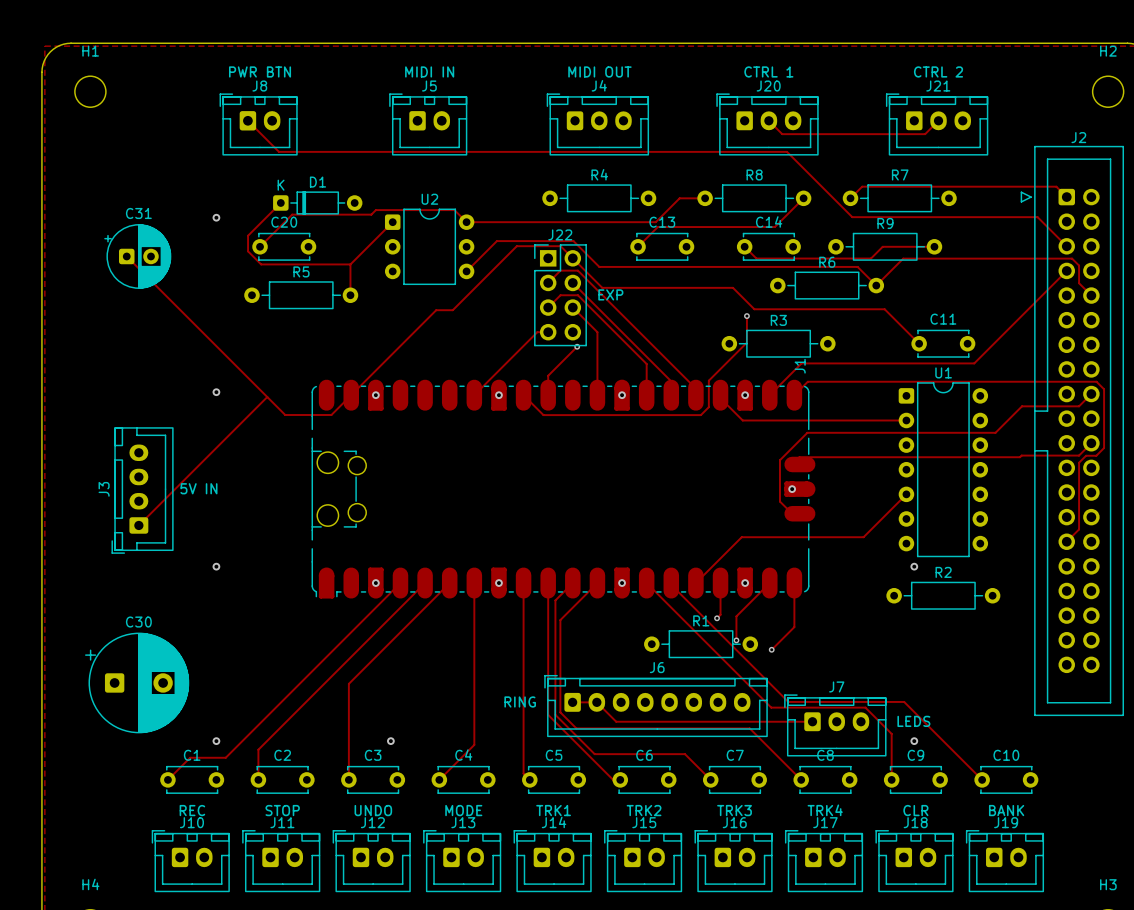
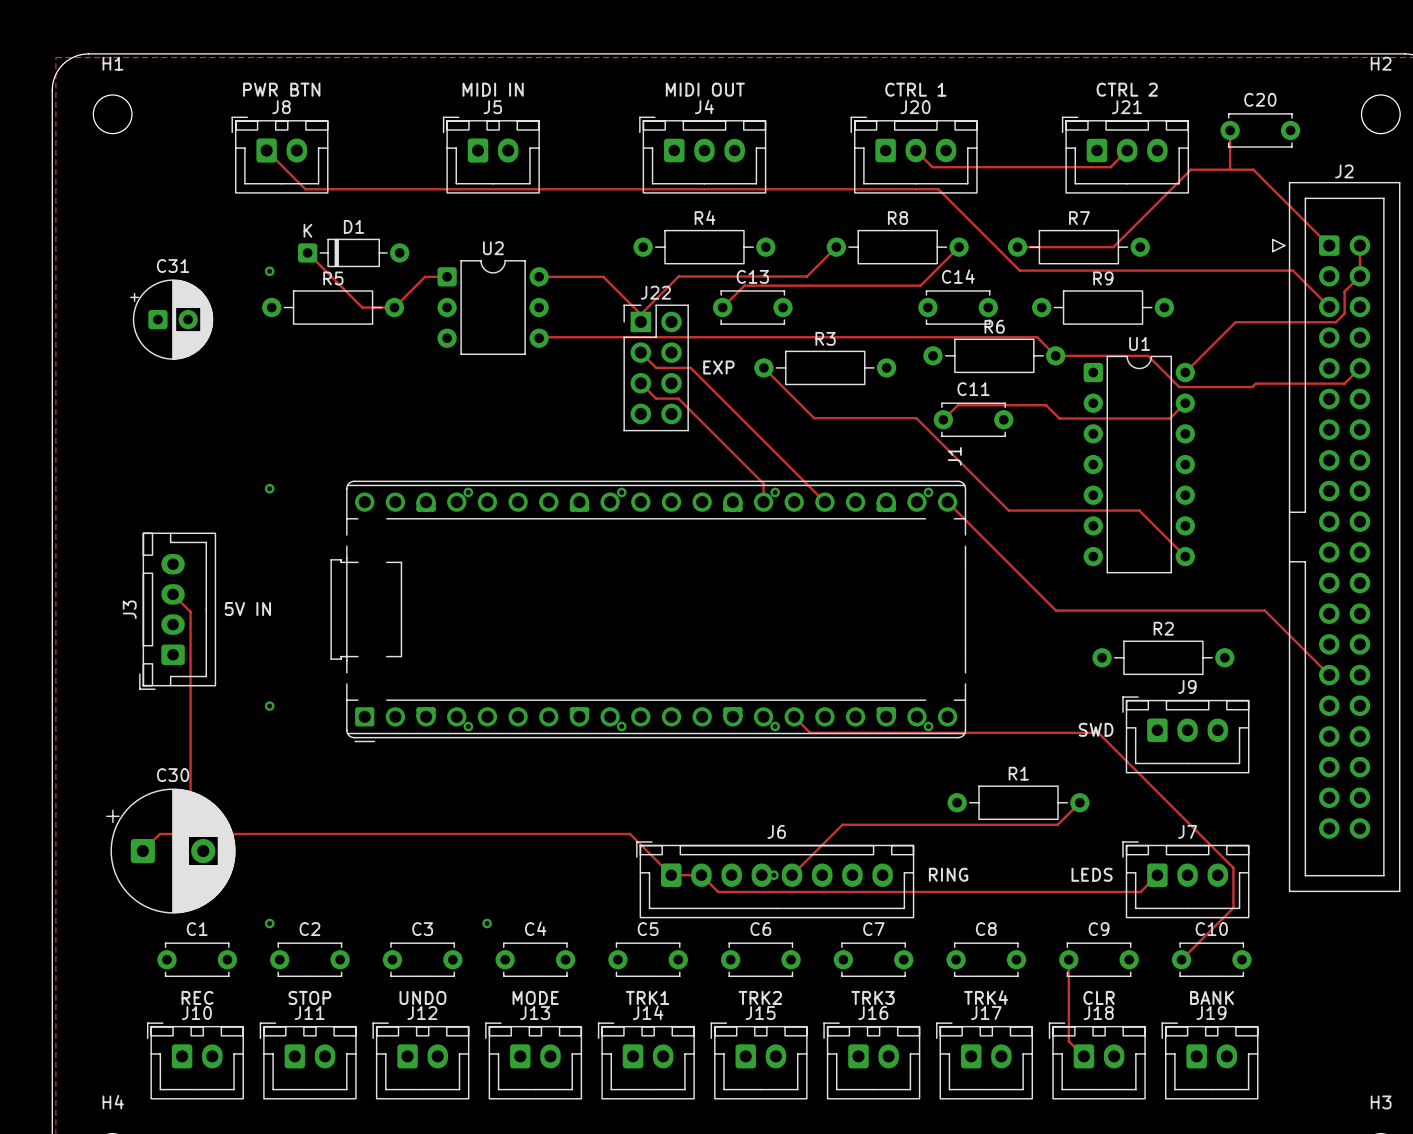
text position: PWR BTN (260, 71) -> PWR BTN (281, 89)
text position: MIDI IN (429, 71) -> MIDI IN (493, 89)
text position: MIDI OUT (599, 71) -> MIDI OUT (705, 89)
text position: CTRL 1 (768, 71) -> CTRL 1 (915, 89)
text position: CTRL 2 (938, 71) -> CTRL 2 (1127, 89)
track: none -> (1230, 130) (1230, 169)
track: (247, 120) (279, 151) -> (266, 150) (305, 189) (347, 189)
track: (768, 120) (782, 134) -> (915, 150) (932, 167) (974, 167)
track: (938, 120) (925, 134) (891, 134) -> (1127, 150) (1110, 167)
J8 position: (258, 124) -> (279, 155)
J5 position: (428, 124) -> (491, 155)
J4 position: (597, 124) -> (702, 155)
J20 position: (767, 124) -> (914, 155)
J21 position: (937, 124) -> (1125, 155)
track: (753, 151) (787, 151) (852, 217) -> (938, 189) (1019, 270) (1062, 270)
track: (1056, 186) (862, 186) (850, 198) -> (1316, 232) (1253, 169) (1190, 169) (1113, 247) (1017, 247)
R4 position: (599, 198) -> (704, 247)
track: none -> (836, 247) (807, 276) (678, 276) (640, 314)
track: (705, 198) (679, 198) (655, 222) (484, 222) -> (640, 314) (603, 276)
R8 position: (754, 198) -> (897, 247)
track: none -> (959, 247) (920, 285) (744, 285) (722, 307)
track: (803, 198) (774, 227) (657, 227) (638, 246) -> none
R7 position: (899, 198) -> (1078, 247)
track: none -> (307, 252) (362, 307) (394, 307) (425, 276) (447, 276)
track: (280, 202) (248, 235) (248, 251) (261, 264) (350, 264) -> none
D1 position: (317, 202) -> (353, 252)
track: (392, 222) (350, 264) -> none
track: (466, 222) (454, 210) (375, 210) (371, 214) (292, 214) (260, 246) -> (581, 276) (539, 276)
C20 position: (284, 246) -> (1260, 130)
U2 position: (429, 246) -> (493, 307)
C13 position: (662, 246) -> (752, 307)
track: (744, 246) (756, 258) (871, 258) (882, 246) (934, 246) -> none
track: (126, 256) (285, 414) (331, 414) (436, 310) (452, 310) (516, 246) (560, 246) (602, 287) (732, 287) (754, 309) (884, 309) (919, 343) -> none
track: (991, 258) (903, 258) (876, 285) (857, 266) (599, 266) (573, 241) (496, 241) (466, 271) -> (1235, 322) (1185, 372)
track: (1072, 258) (1079, 265) (1079, 283) (1091, 295) -> (1335, 322) (1344, 313) (1344, 291) (1359, 276) (1359, 245)
track: (350, 264) (350, 295) -> none
track: (560, 270) (548, 282) -> (698, 337) (539, 338)
track: (577, 270) (695, 388) (695, 395) -> (720, 337) (1037, 337) (1055, 355) (1148, 355) (1179, 387) (1252, 387) (1255, 383) (1344, 383) (1359, 368)
track: (1066, 270) (974, 363) (801, 363) (769, 395) -> none
track: none -> (640, 352) (656, 367) (690, 367) (824, 502)
track: (572, 282) (671, 381) (671, 395) -> none
R6 position: (827, 285) -> (994, 355)
text position: EXP (610, 294) -> EXP (718, 367)
R5 position: (301, 295) -> (333, 307)
J22 position: (560, 295) -> (656, 367)
track: none -> (763, 367) (814, 418) (916, 418) (1008, 510) (1139, 510) (1185, 556)
track: none -> (640, 383) (656, 398) (678, 398) (763, 483) (763, 502)
track: (548, 307) (560, 295) (577, 295) (646, 363) (646, 395) -> none
track: (572, 307) (597, 332) (597, 395) -> none
track: (746, 316) (746, 342) (708, 380) (708, 407) (700, 415) (543, 415) (523, 395) -> none
via: (746, 316) -> none
track: none -> (1185, 403) (1169, 418) (1059, 418) (1046, 405) (957, 405) (943, 419)
track: (548, 332) (537, 332) (474, 395) -> none
R3 position: (778, 343) -> (825, 367)
C11 position: (943, 343) -> (973, 419)
track: (577, 346) (548, 375) (548, 395) -> none
via: (577, 346) -> none
J1 footprint: [311, 379, 816, 599] -> [330, 480, 967, 743]
track: (1091, 394) (1079, 406) (1021, 406) (995, 432) (807, 432) (779, 460) (779, 501) (792, 513) -> none
track: (720, 395) (720, 398) (742, 420) (906, 420) -> none
track: (794, 395) (807, 381) (1096, 381) (1104, 389) (1104, 448) (1096, 455) (1086, 455) (1079, 462) (1079, 529) (1066, 541) -> (947, 502) (1056, 610) (1264, 610) (1329, 675)
track: (267, 397) (138, 525) -> none
track: (1091, 443) (1079, 455) (799, 457) (792, 464) -> none
U1 position: (943, 469) -> (1139, 464)
track: none -> (173, 594) (190, 611) (190, 834)
via: (792, 489) -> none
track: (906, 494) (863, 537) (741, 537) (695, 583) -> none
via: (914, 566) -> none
track: none -> (794, 716) (810, 732) (1098, 732) (1233, 867) (1233, 907) (1181, 959)
track: (400, 583) (225, 757) (190, 757) (167, 779) -> none
track: (425, 583) (258, 749) (258, 779) -> none
track: (449, 583) (348, 683) (348, 779) -> none
track: (474, 583) (474, 744) (439, 779) -> none
track: (523, 583) (523, 773) (529, 779) -> none
track: (548, 583) (548, 714) (613, 779) (620, 779) -> none
track: (572, 583) (555, 600) (555, 714) (594, 754) (684, 754) (710, 779) -> none
track: (597, 583) (560, 620) (560, 712) (576, 728) (749, 728) (801, 779) -> none
track: (646, 583) (771, 707) (865, 707) (891, 733) (891, 779) -> none
track: (671, 583) (788, 701) (904, 701) (982, 779) -> none
track: (720, 583) (720, 614) (717, 618) -> none
track: (769, 583) (736, 616) (736, 640) -> none
track: (794, 583) (794, 627) (771, 649) -> none
text: none -> SWD (1096, 729)
J9: none -> (1185, 734)
R2 position: (943, 595) -> (1163, 657)
via: (717, 618) -> none
via: (736, 640) -> none
R1 position: (701, 644) -> (1018, 802)
track: none -> (1079, 802) (1057, 824) (842, 824) (792, 875)
via: (771, 649) -> none
track: none -> (142, 851) (159, 834) (630, 834) (671, 875) (701, 875) (718, 891) (1140, 891) (1157, 875)
text position: RING (520, 701) -> RING (948, 874)
track: (572, 702) (596, 702) (616, 721) (812, 721) -> none
J6 position: (656, 706) -> (775, 879)
text position: LEDS (913, 721) -> LEDS (1092, 874)
J7 position: (835, 725) -> (1185, 879)
via: (914, 741) -> none
track: none -> (1068, 959) (1068, 1041) (1083, 1056)
C1 position: (192, 779) -> (197, 959)
C2 position: (282, 779) -> (309, 959)
C3 position: (373, 779) -> (422, 959)
C4 position: (463, 779) -> (535, 959)
C5 position: (554, 779) -> (648, 959)
C6 position: (644, 779) -> (760, 959)
C7 position: (734, 779) -> (873, 959)
C8 position: (825, 779) -> (986, 959)
C9 position: (915, 779) -> (1099, 959)
C10 position: (1006, 779) -> (1211, 959)
text position: REC (192, 810) -> REC (197, 997)
text position: STOP (282, 810) -> STOP (309, 997)
text position: UNDO (373, 810) -> UNDO (422, 997)
text position: MODE (463, 810) -> MODE (535, 997)
text position: TRK1 (553, 810) -> TRK1 (647, 997)
text position: TRK2 (644, 810) -> TRK2 (760, 997)
text position: TRK3 (734, 810) -> TRK3 (872, 997)
text position: TRK4 (825, 810) -> TRK4 (986, 997)
text position: CLR (915, 810) -> CLR (1099, 997)
text position: BANK (1006, 810) -> BANK (1212, 997)
J10 position: (190, 861) -> (195, 1060)
J11 position: (281, 861) -> (308, 1060)
J12 position: (371, 861) -> (420, 1060)
J13 position: (462, 861) -> (533, 1060)
J14 position: (552, 861) -> (646, 1060)
J15 position: (643, 861) -> (759, 1060)
J16 position: (733, 861) -> (871, 1060)
J17 position: (824, 861) -> (984, 1060)
J18 position: (914, 861) -> (1097, 1060)
J19 position: (1004, 861) -> (1210, 1060)

